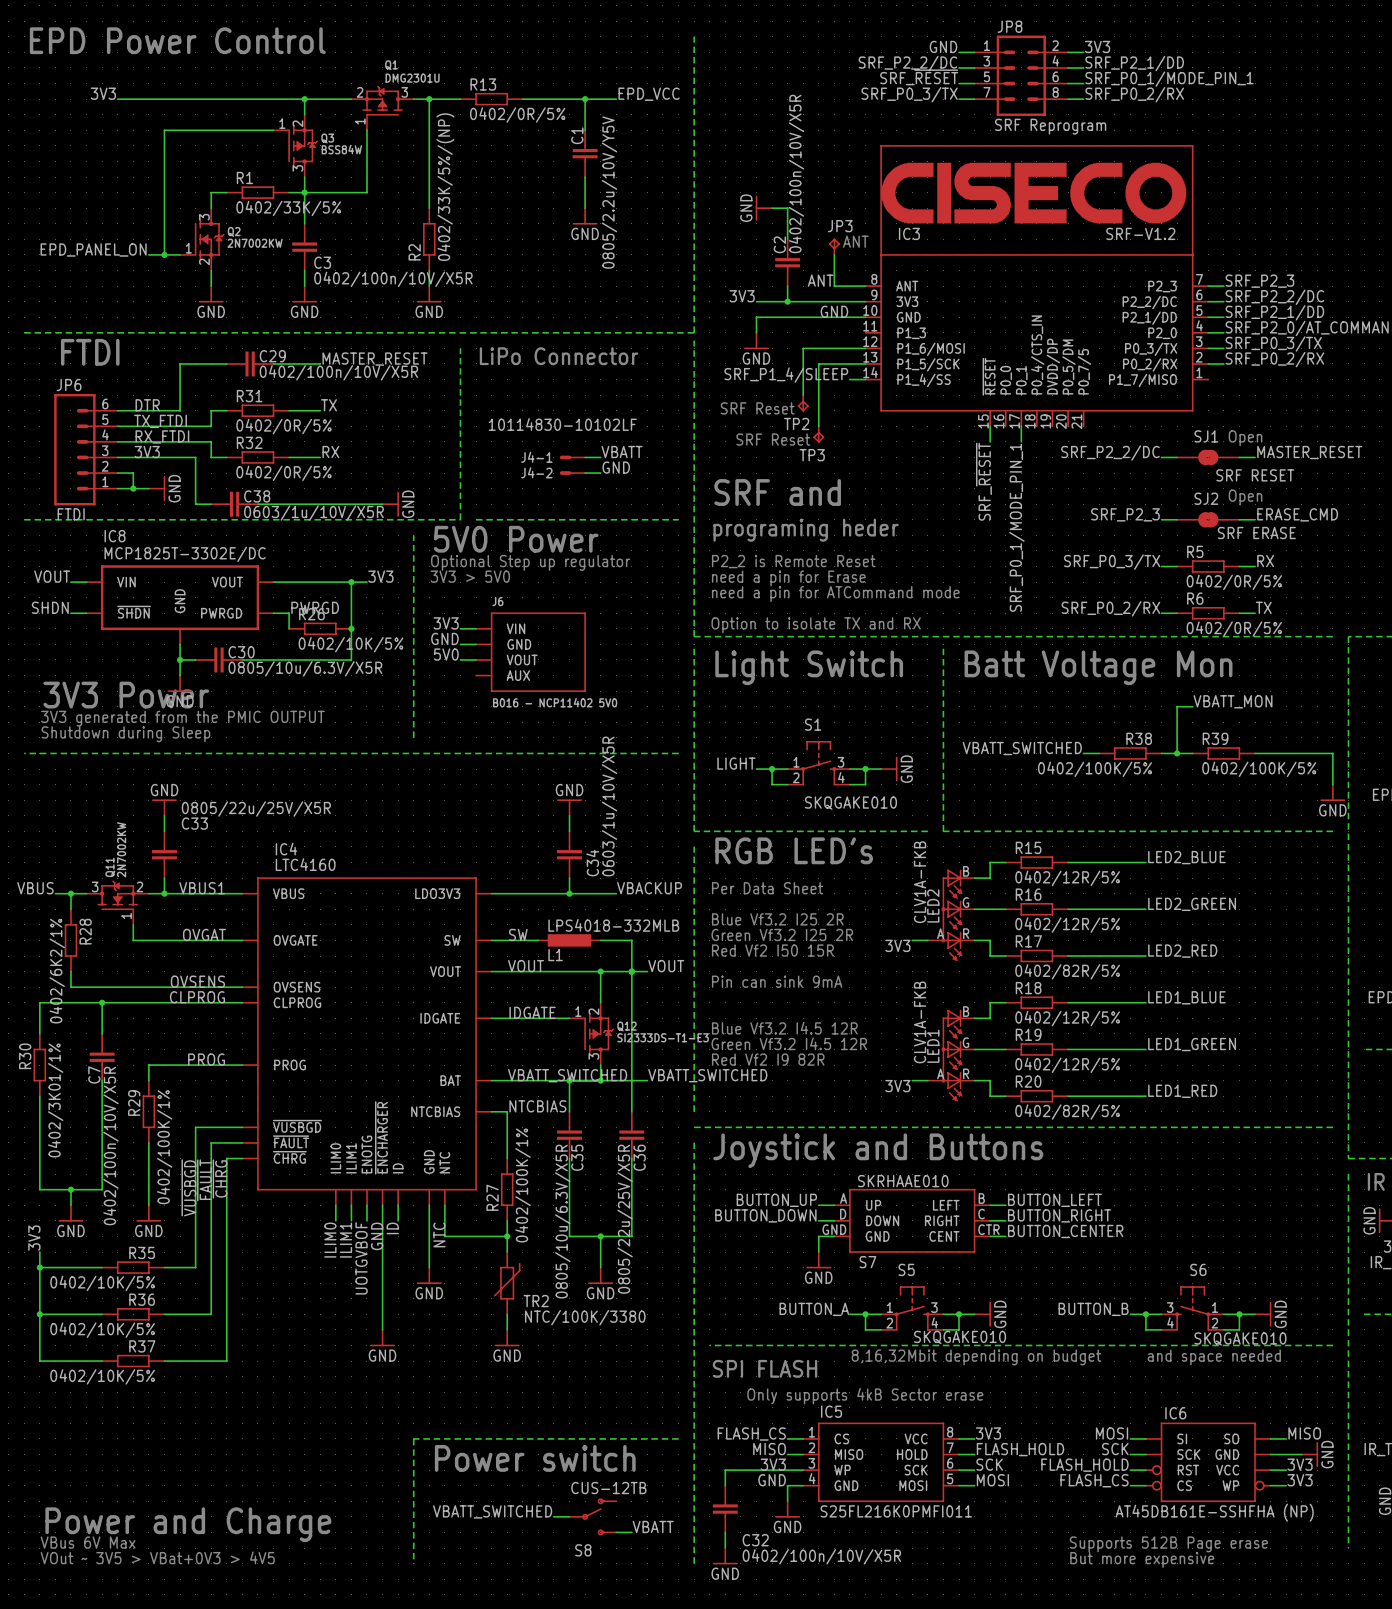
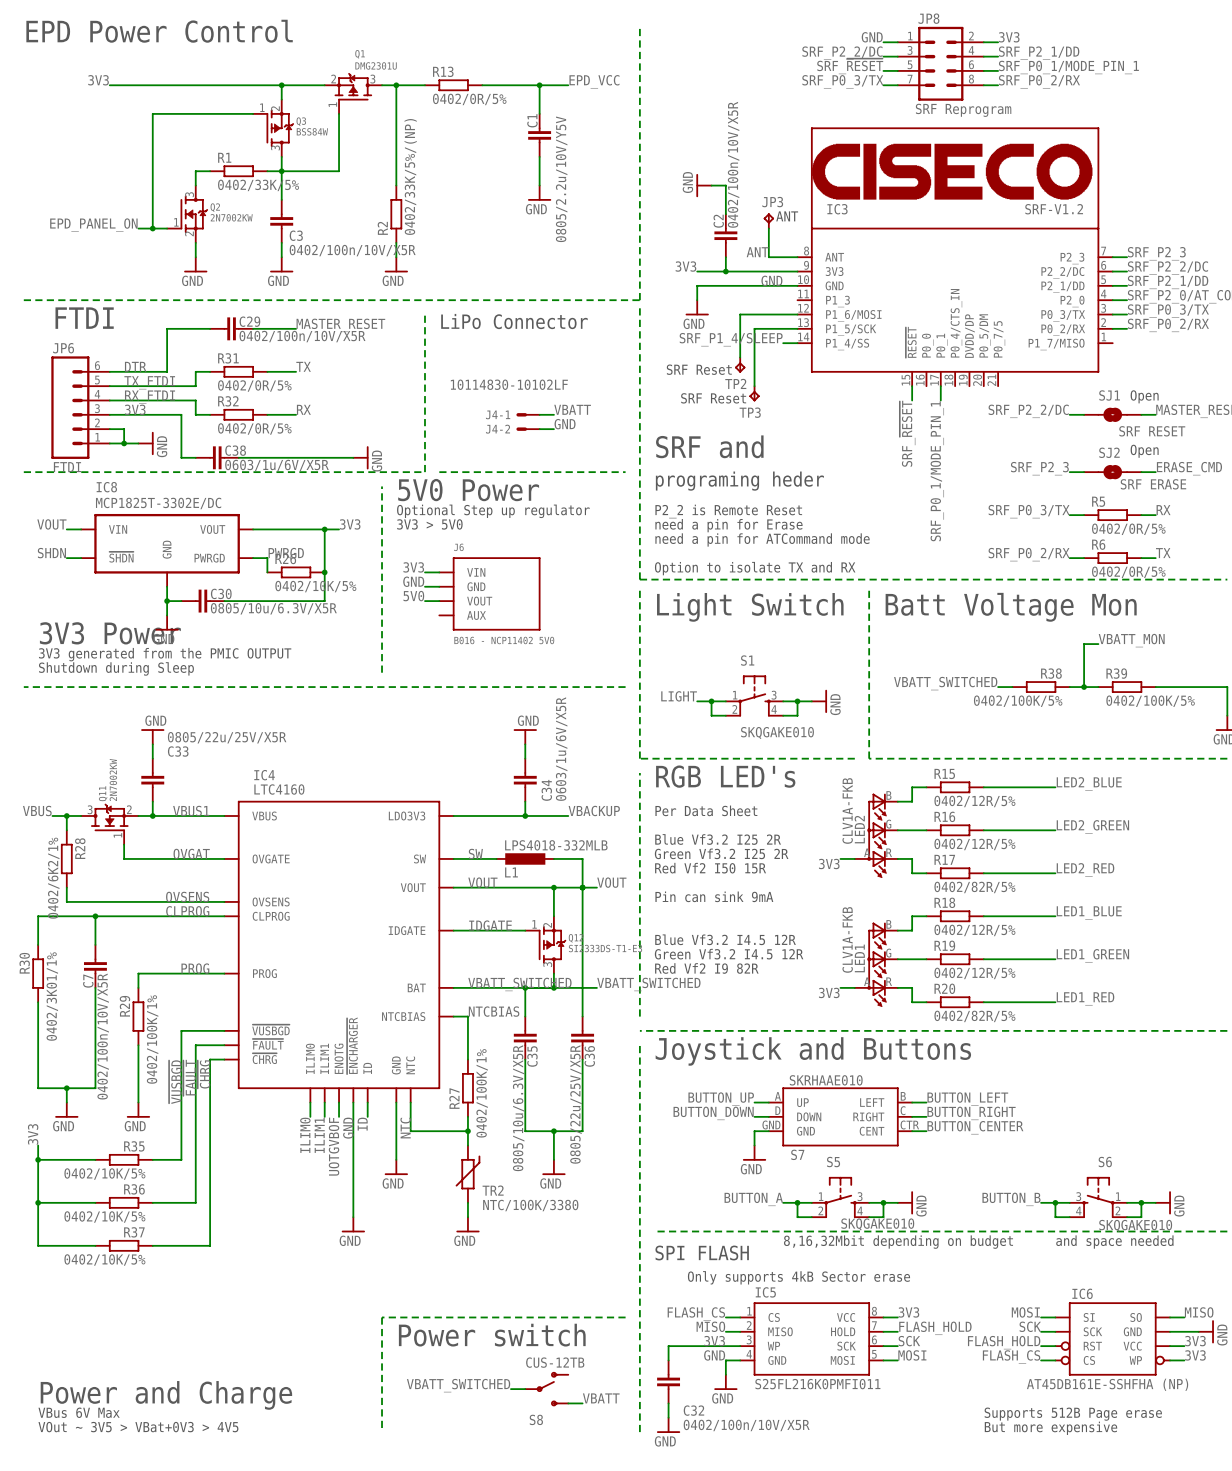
C38 value: 0603/1u/10V/X5R (313, 513) -> 0603/1u/6V/X5R (276, 465)
C34 value: 0603/1u/10V/X5R (609, 806) -> 0603/1u/6V/X5R (561, 749)

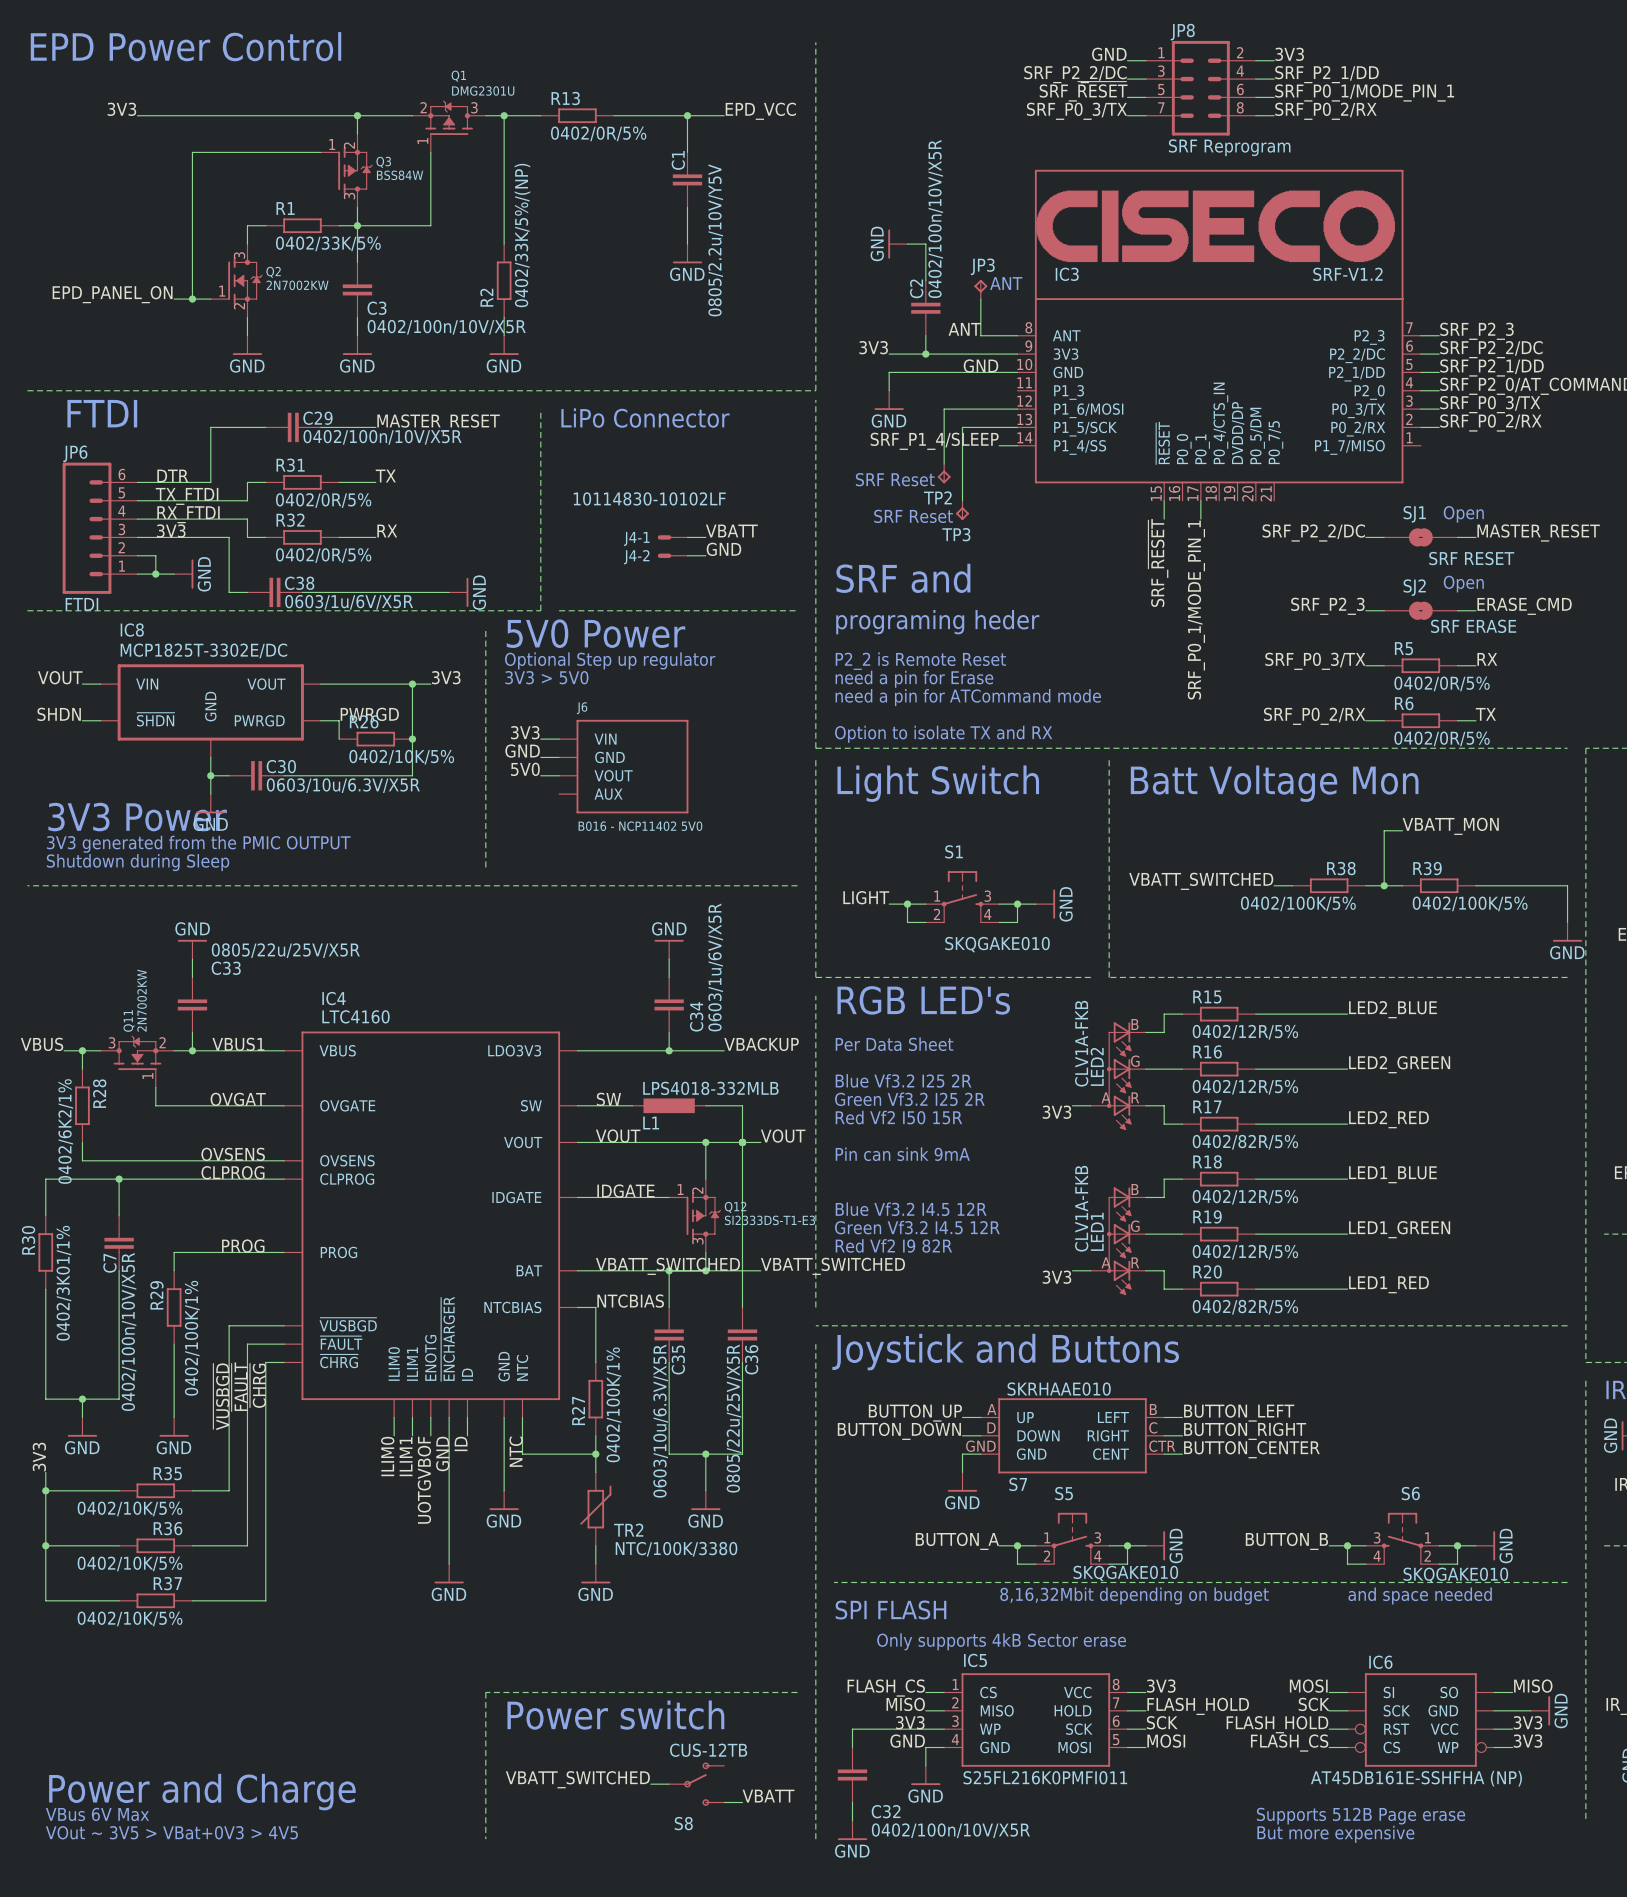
C30 value: 0805/10u/6.3V/X5R (273, 608) -> 0603/10u/6.3V/X5R (343, 785)
C35 value: 0805/10u/6.3V/X5R (518, 1108) -> 0603/10u/6.3V/X5R (660, 1421)

